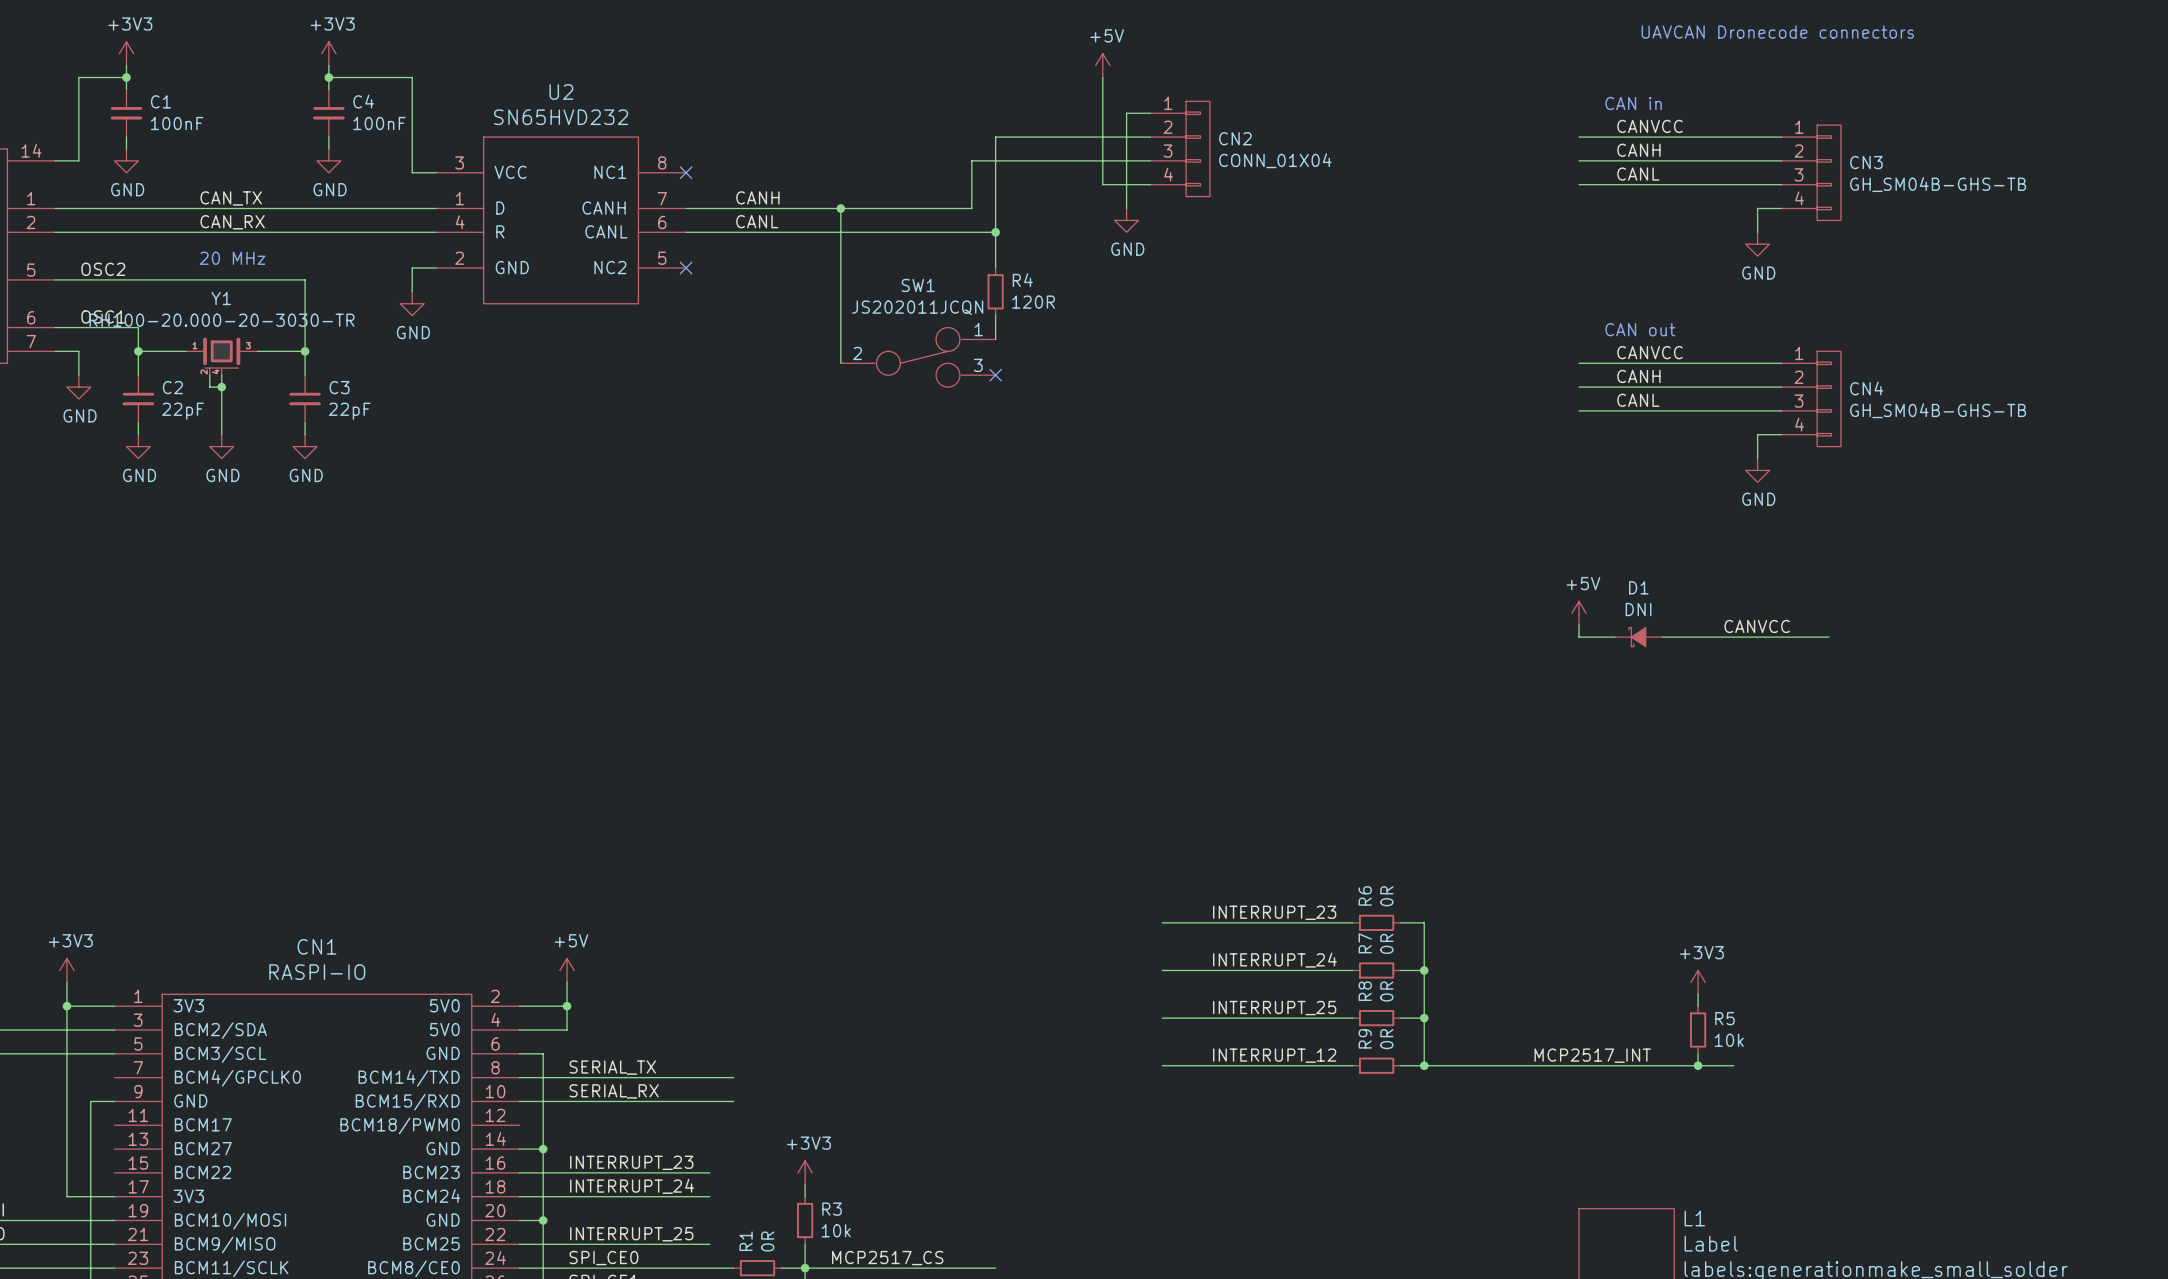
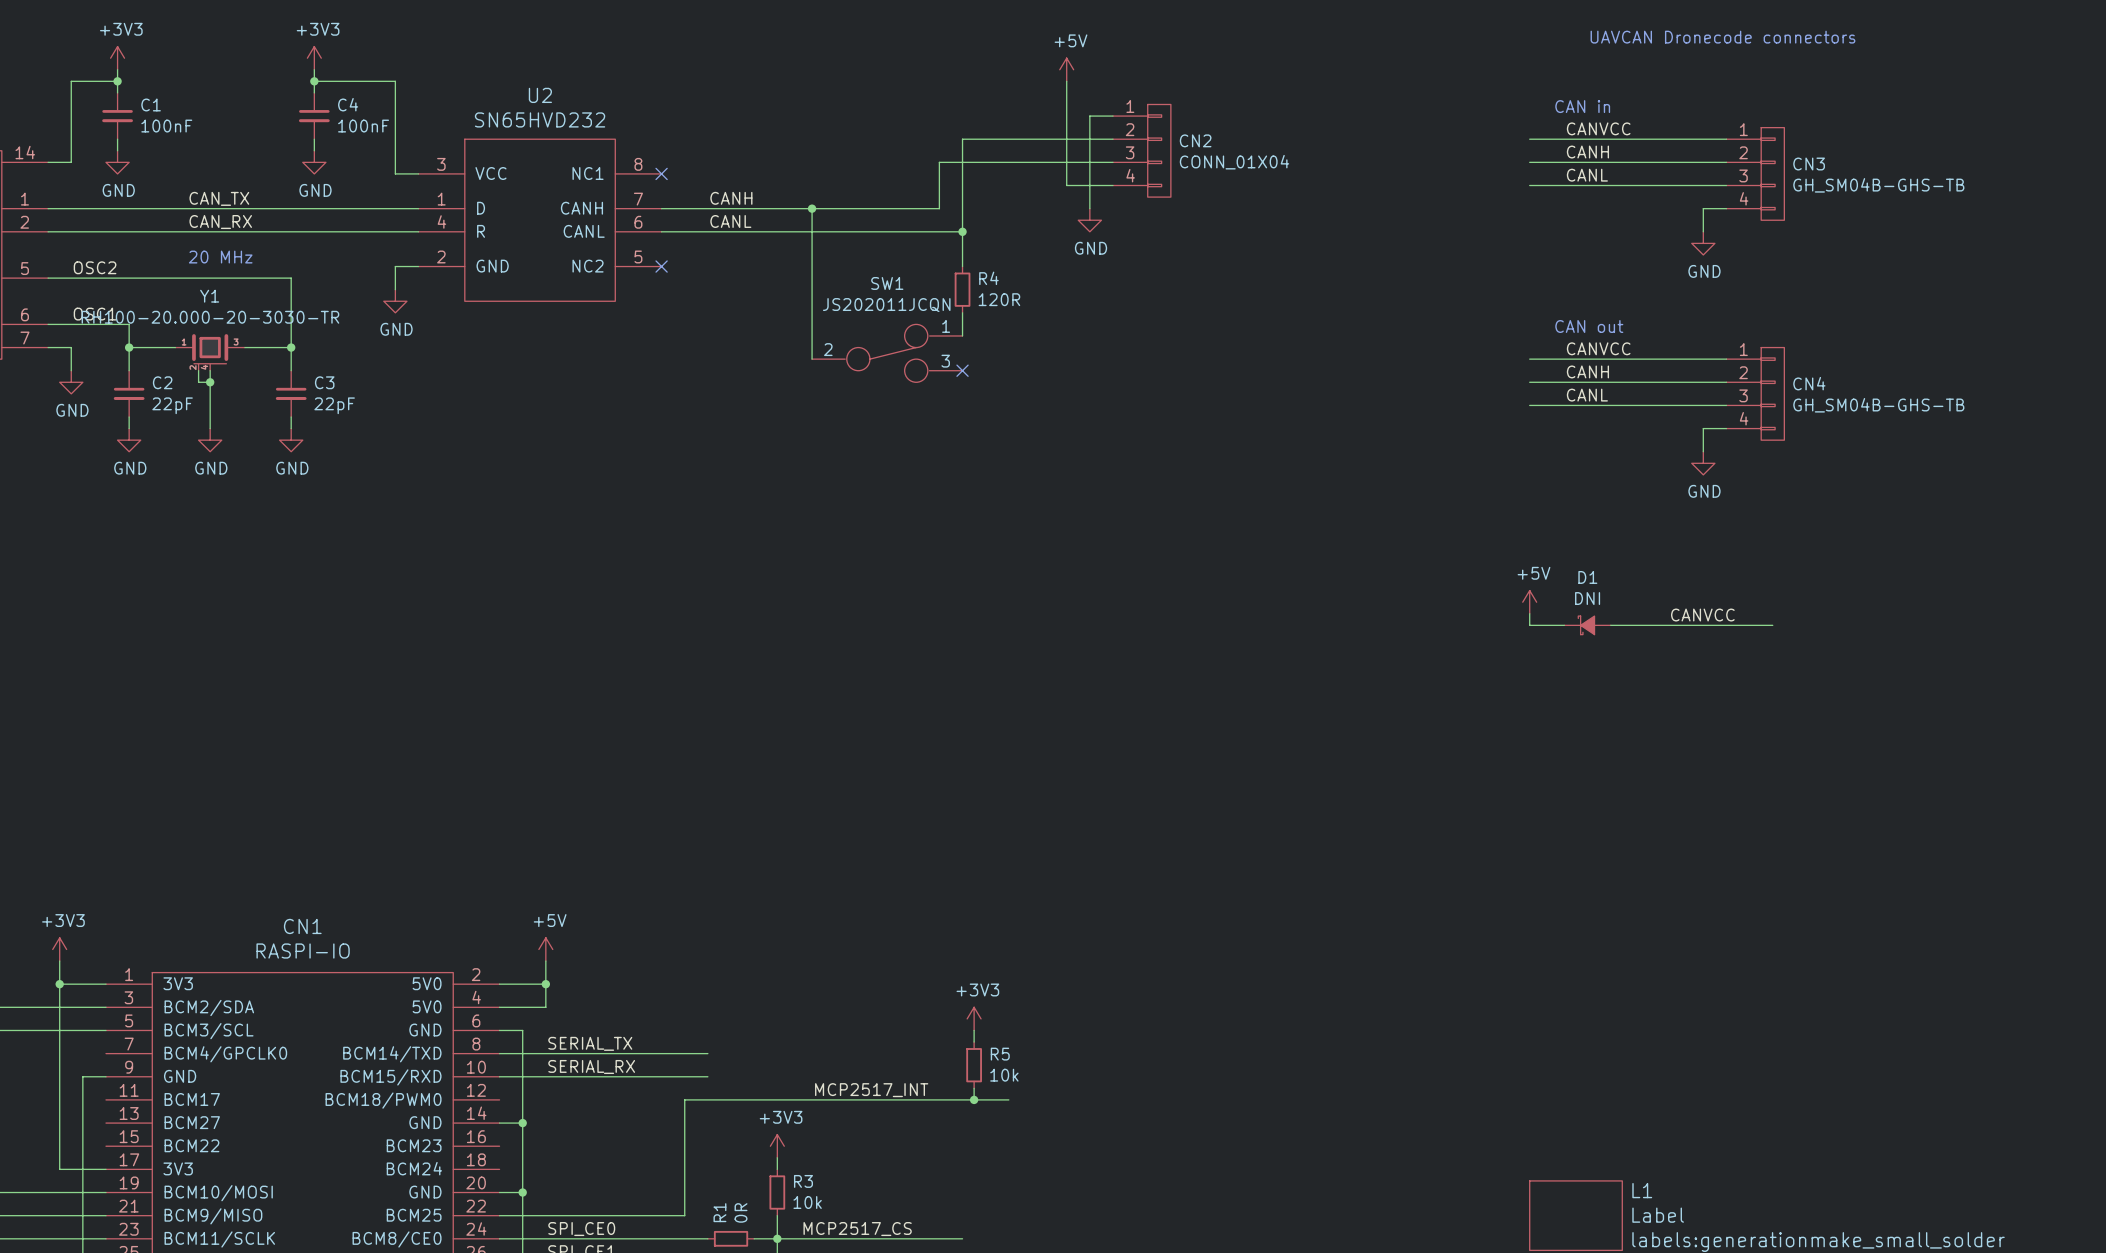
label: INTERRUPT_23 (1274, 912) -> none
wire: (1162, 922) (1352, 922) -> none
R6: 0R (1376, 922) -> none
wire: (1400, 922) (1424, 922) (1424, 1065) -> none
label: INTERRUPT_24 (1274, 960) -> none
wire: (1162, 970) (1352, 970) -> none
R7: 0R (1376, 970) -> none
wire: (1400, 970) (1424, 970) -> none
junction: (1424, 970) -> none
power symbol: +3V3 (1698, 982) -> none
wire: (1698, 994) (1698, 1006) -> none
label: INTERRUPT_25 (1274, 1008) -> none
wire: (1162, 1018) (1352, 1018) -> none
R8: 0R (1376, 1018) -> none
wire: (1400, 1018) (1424, 1018) -> none
junction: (1424, 1018) -> none
R5 position: (1698, 1030) -> (974, 1065)
power symbol: none -> +3V3 (974, 1018)
wire: none -> (974, 1030) (974, 1042)
wire: (1698, 1053) (1698, 1065) -> none
label: INTERRUPT_12 (1274, 1055) -> none
label: MCP2517_INT (1592, 1055) -> none
wire: (1162, 1065) (1352, 1065) -> none
R9: 0R (1376, 1065) -> none
wire: (1400, 1065) (1733, 1065) -> none
junction: (1424, 1065) -> none
junction: (1698, 1065) -> none
wire: none -> (974, 1088) (974, 1099)
label: none -> MCP2517_INT (871, 1090)
junction: none -> (974, 1099)
wire: none -> (1008, 1099) (684, 1099) (684, 1215)
label: INTERRUPT_23 (631, 1162) -> none
wire: (519, 1172) (709, 1172) -> none
label: INTERRUPT_24 (632, 1186) -> none
wire: (519, 1196) (709, 1196) -> none
label: INTERRUPT_25 (631, 1234) -> none

